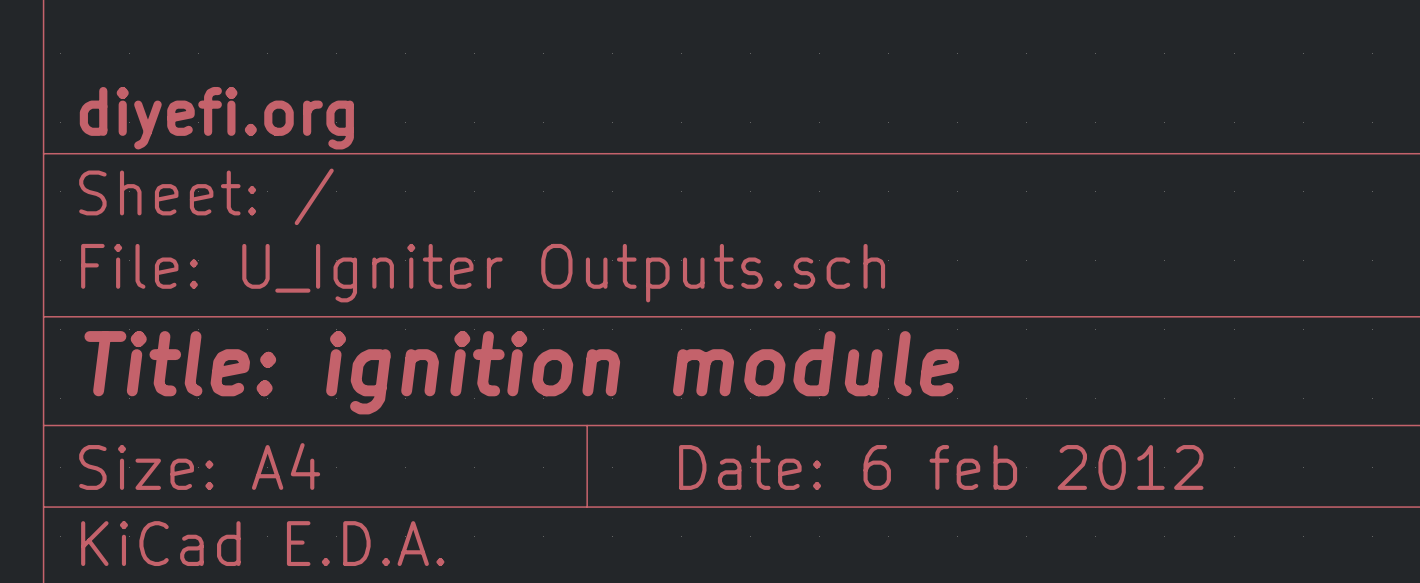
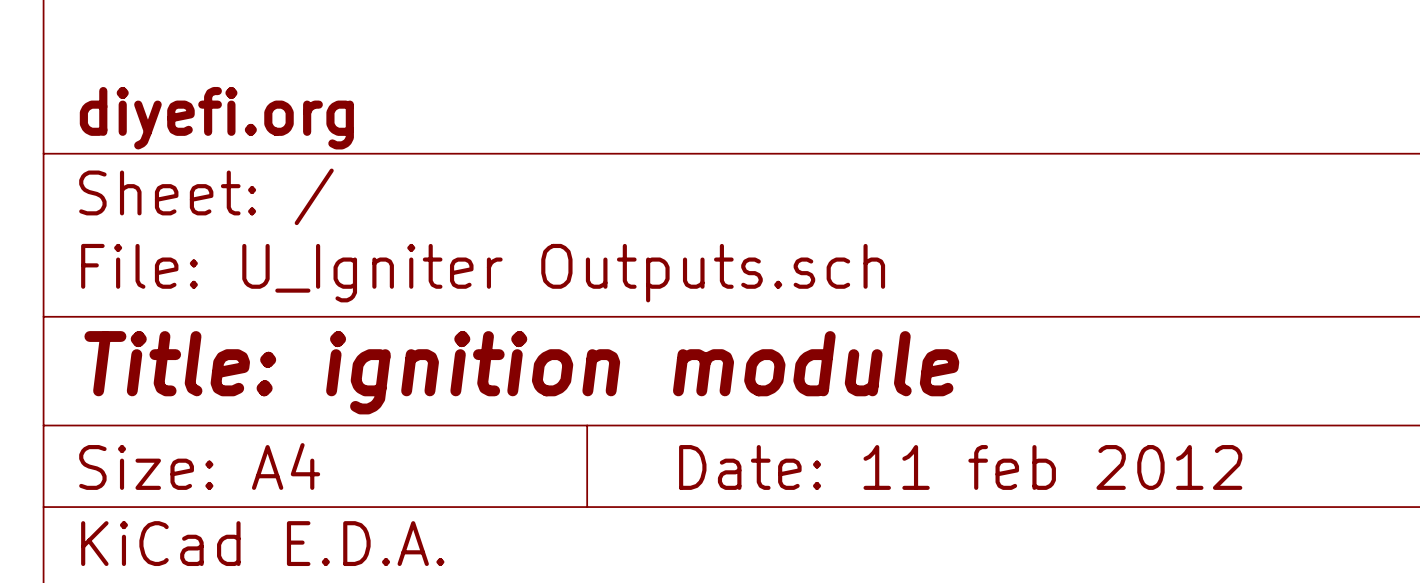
title block: Date: 6 feb 2012 (941, 467) -> Date: 11 feb 2012 (960, 467)

